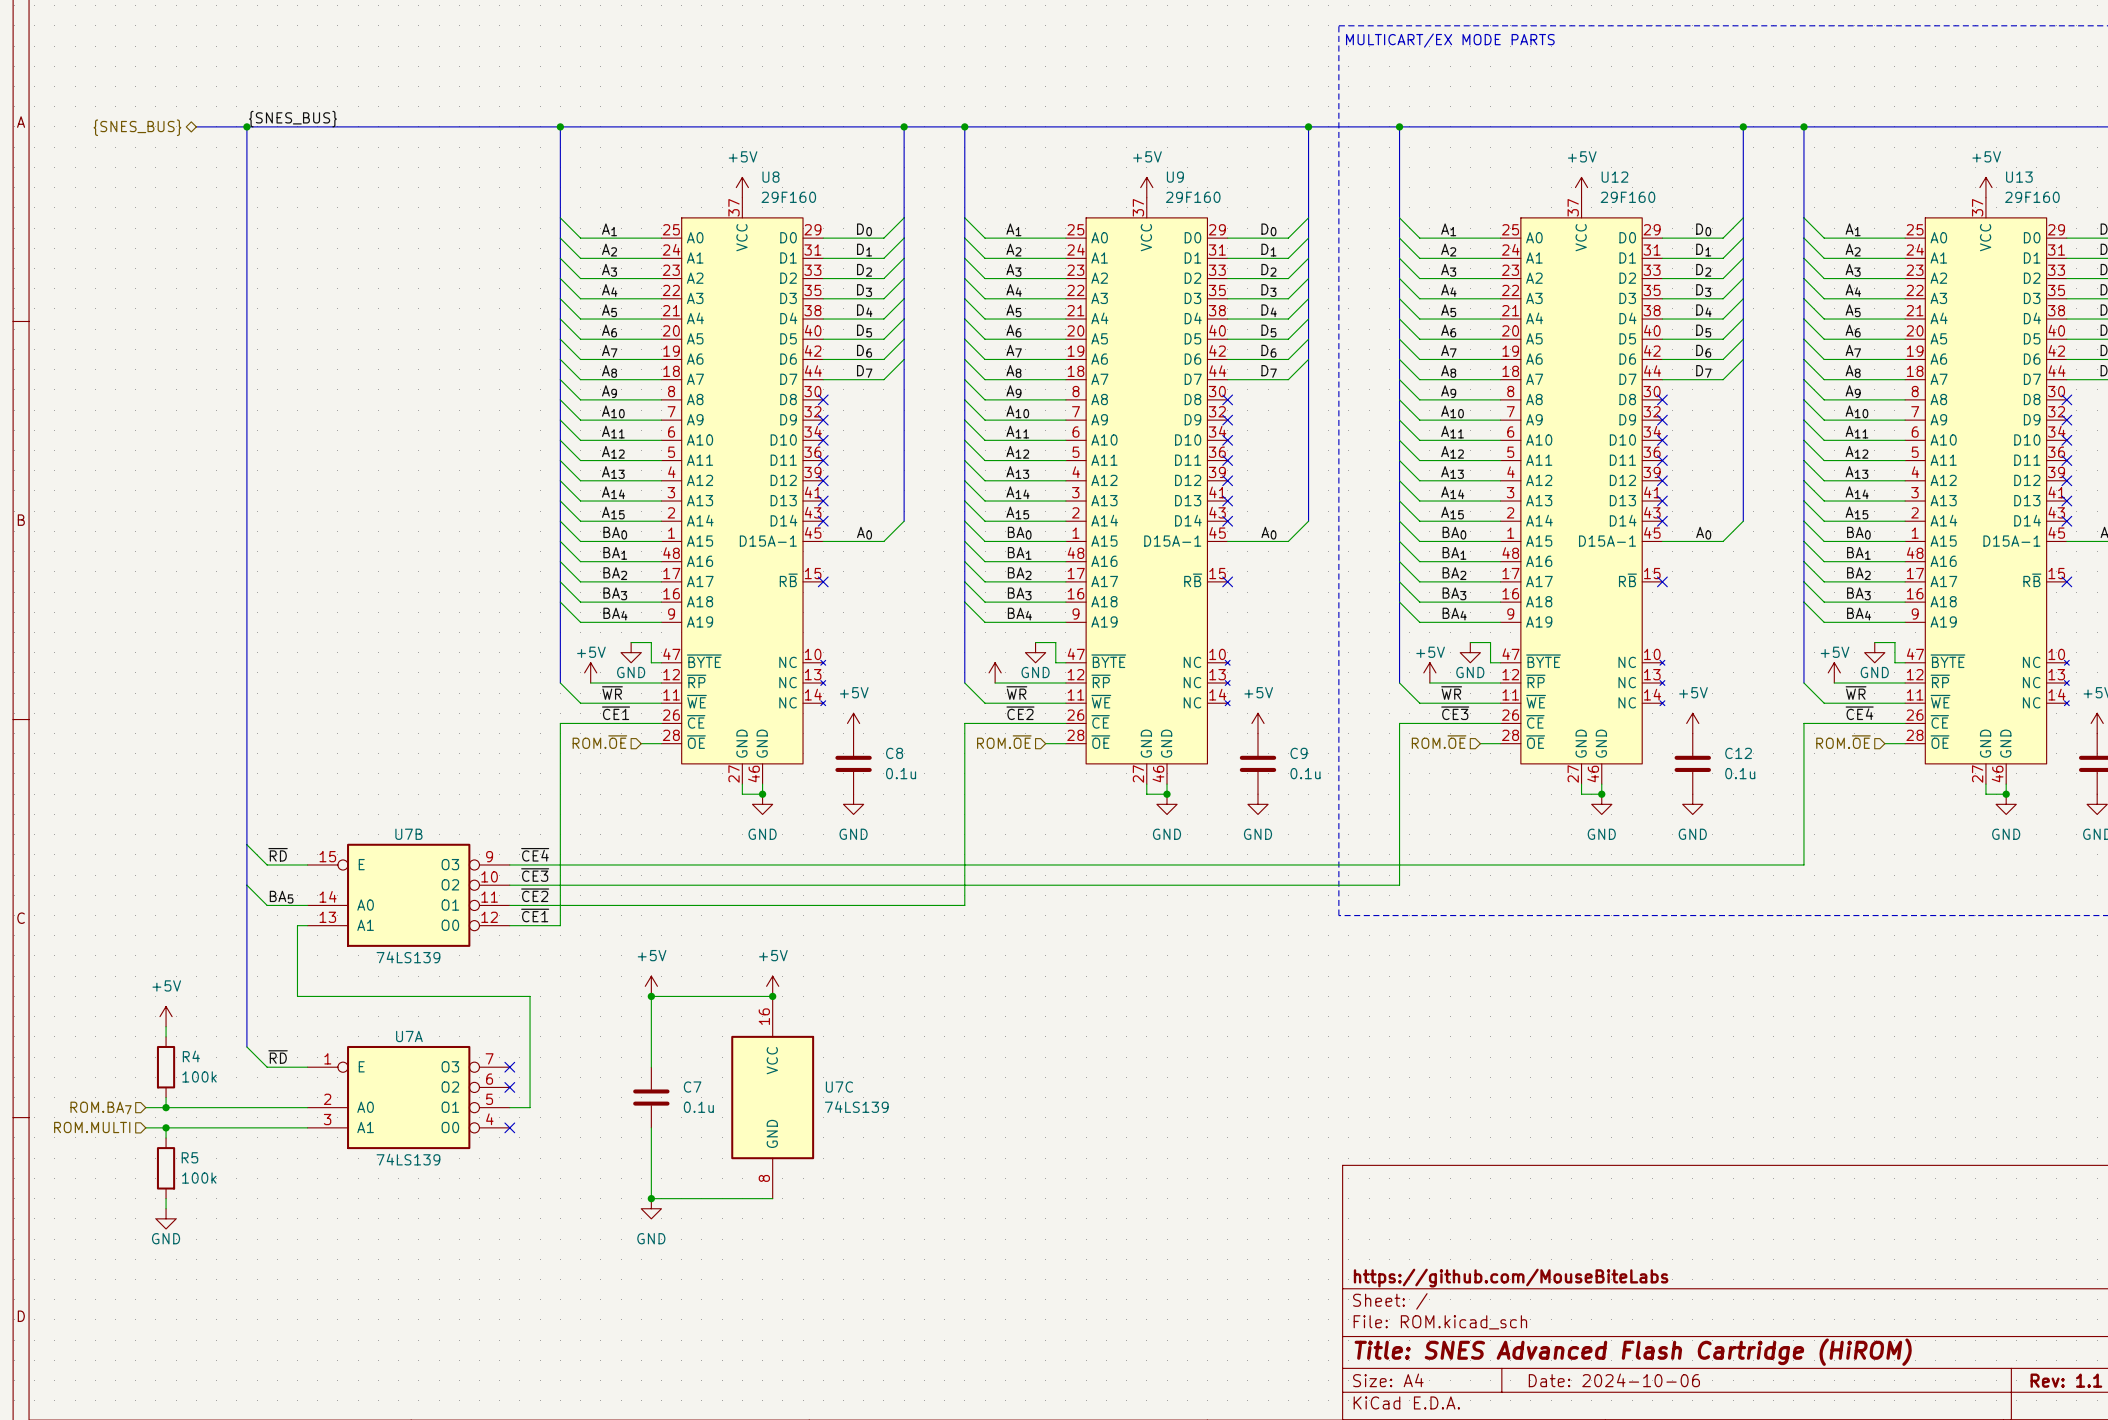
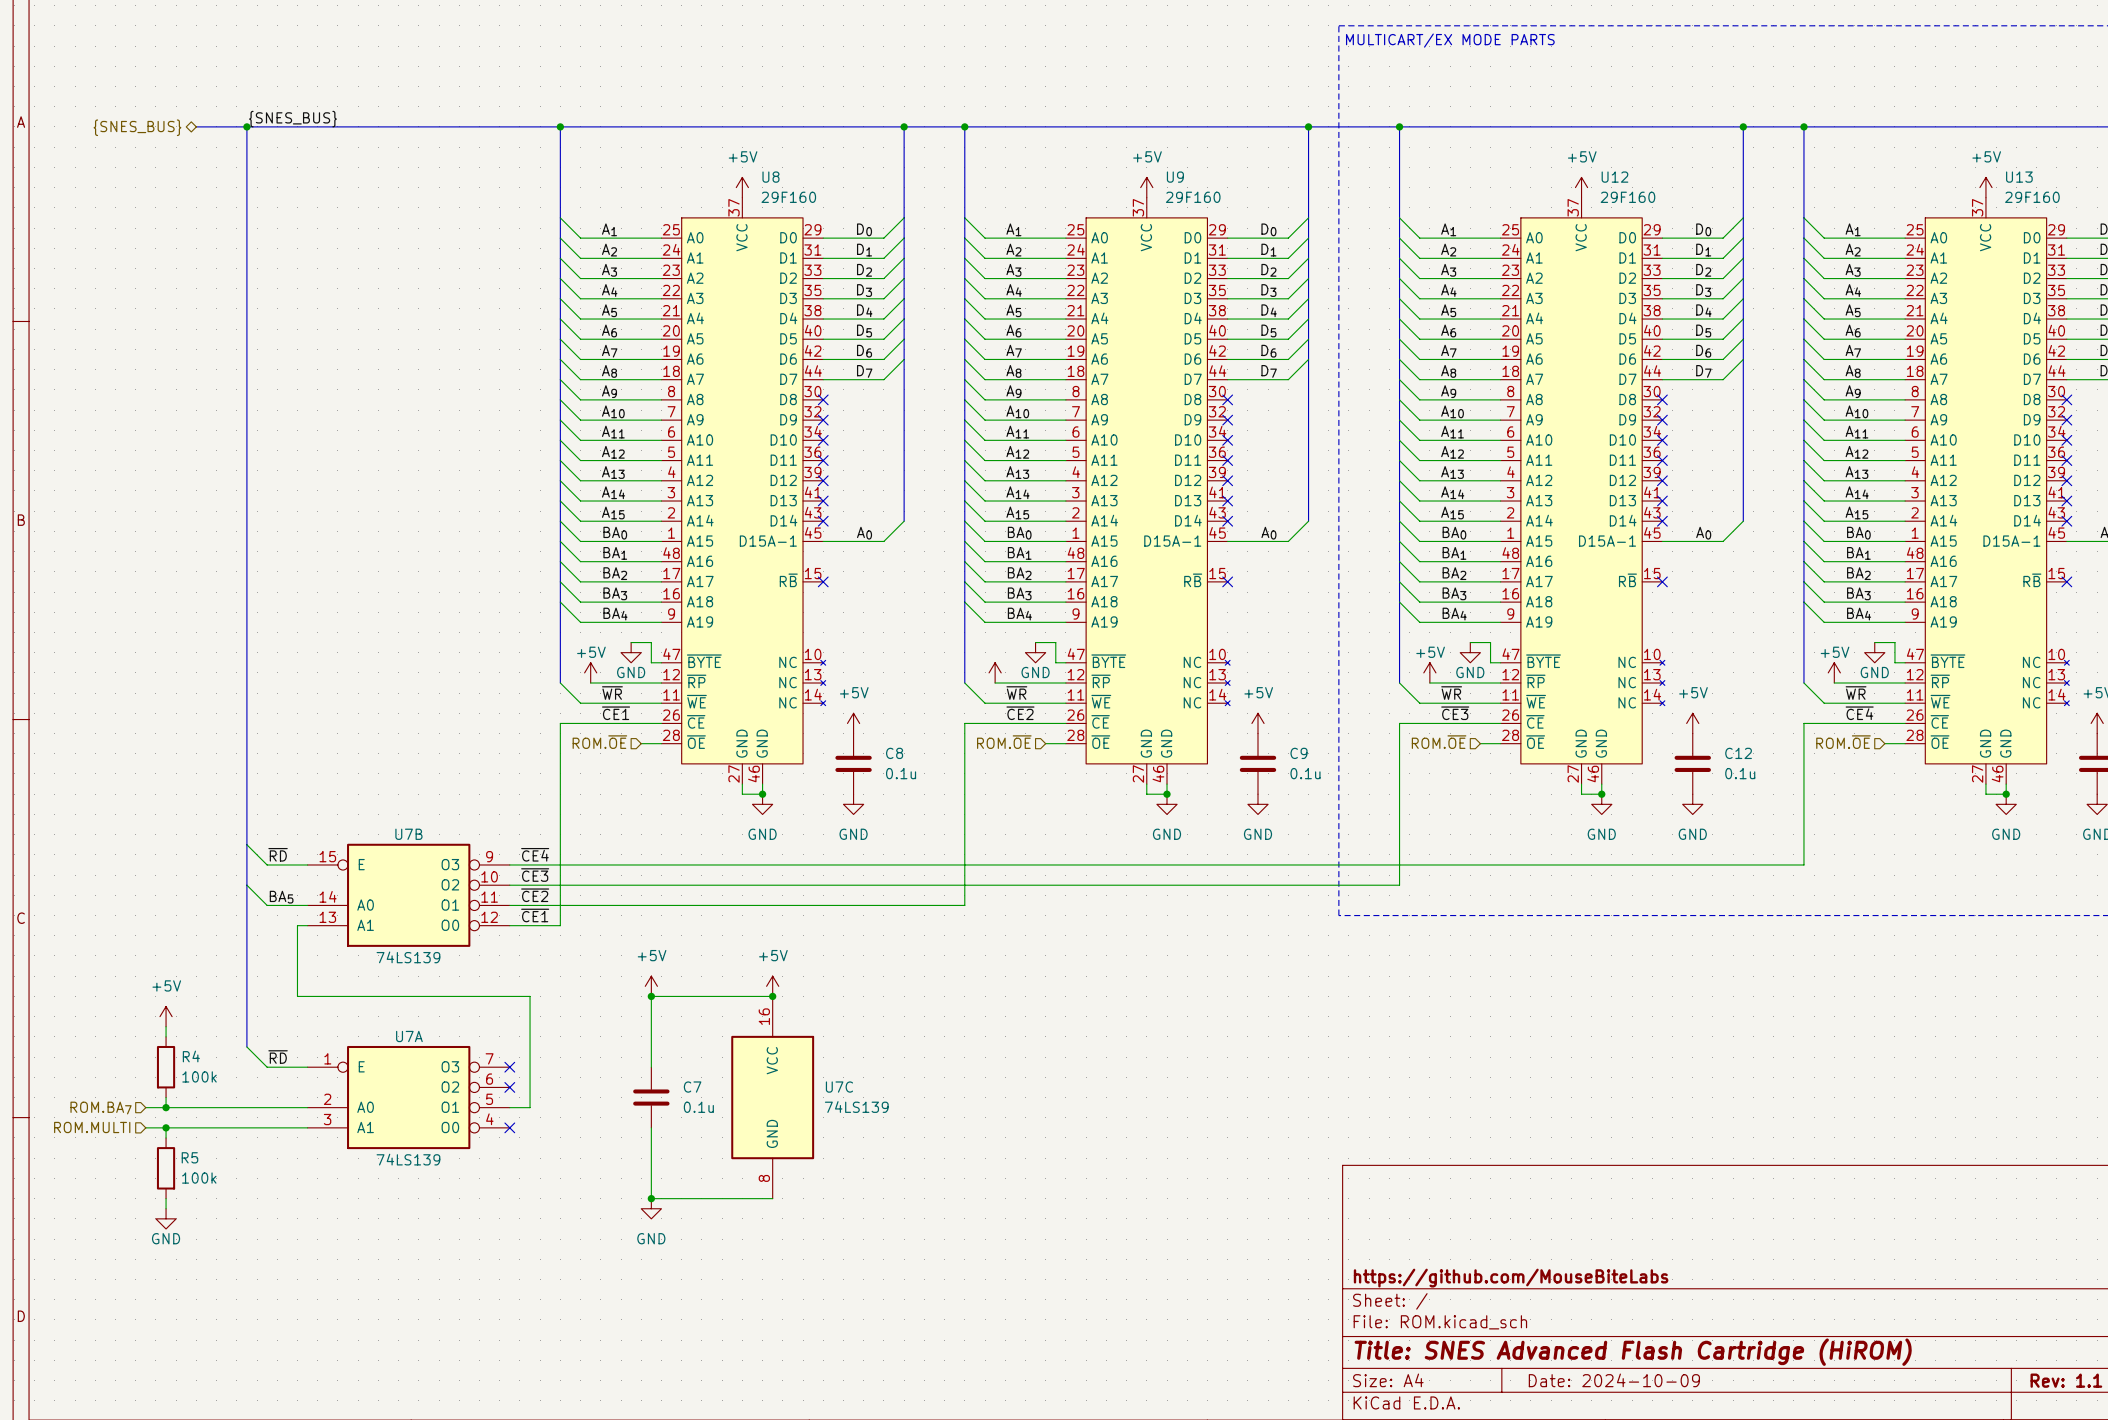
title block: Date: 2024-10-06 (1614, 1380) -> Date: 2024-10-09 (1614, 1380)

